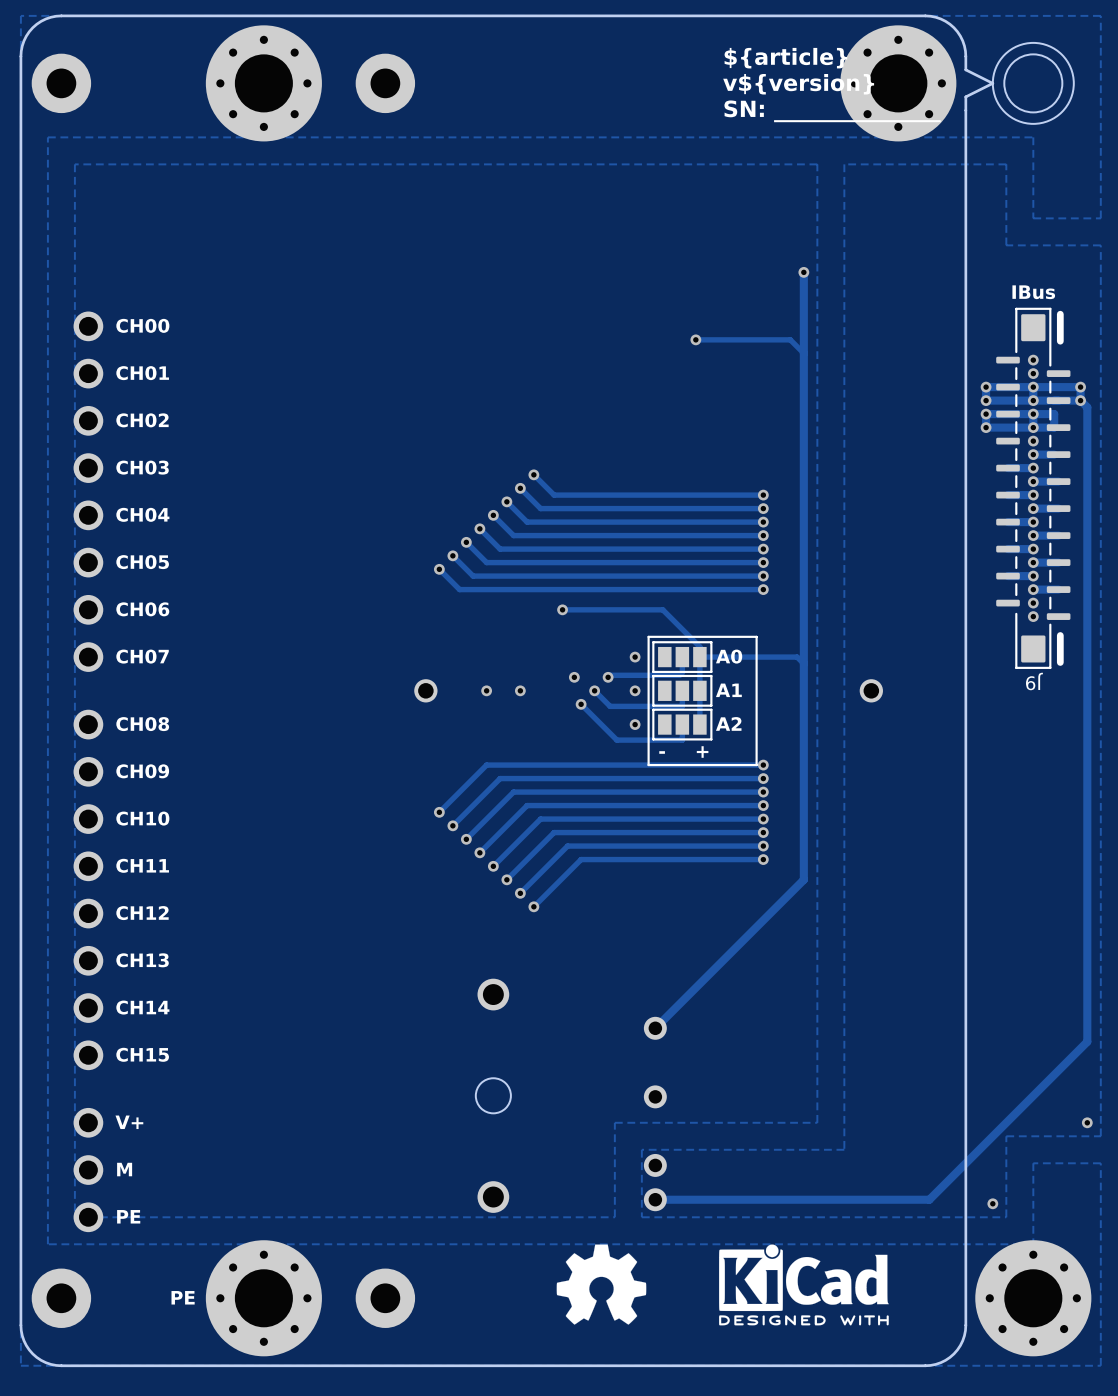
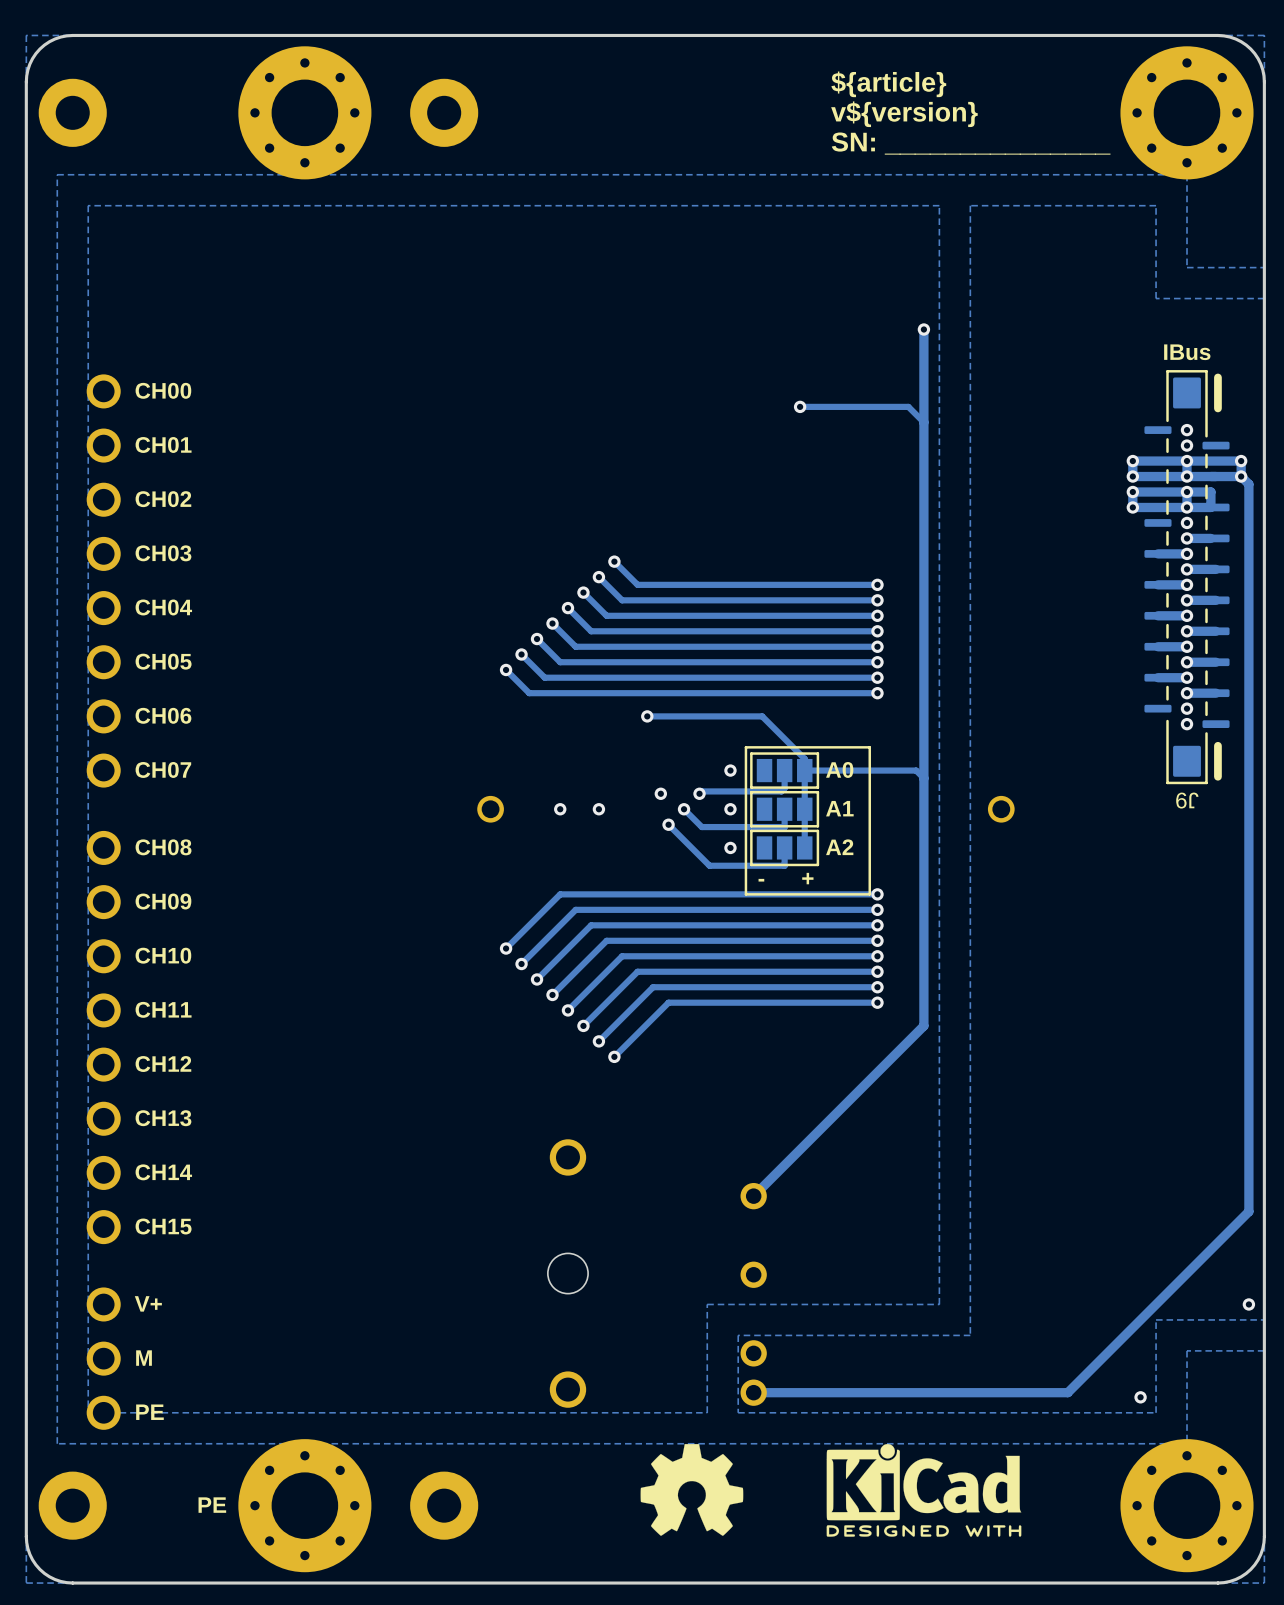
board edge: (925, 15) (940, 18) (953, 27) (964, 45) (965, 69) (992, 83) (965, 96) (965, 1325) (962, 1340) (953, 1353) (940, 1362) (925, 1365) -> (1063, 35) (1229, 37) (1246, 45) (1254, 53) (1262, 69) (1264, 81) (1263, 1542) (1260, 1554) (1254, 1564) (1241, 1576) (1229, 1581) (1063, 1583)
round board edge: [992, 42, 1075, 125] -> none
round board edge: [1003, 54, 1063, 113] -> none
part position: (898, 83) -> (1187, 112)

